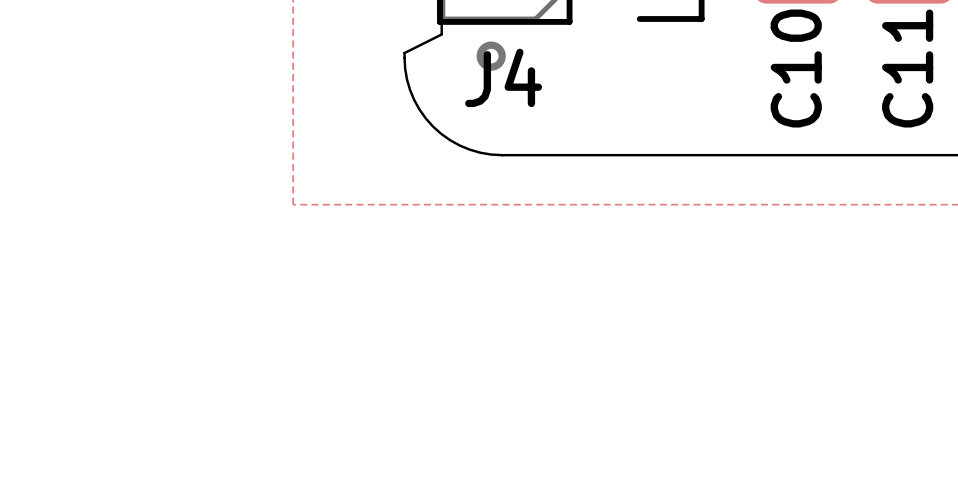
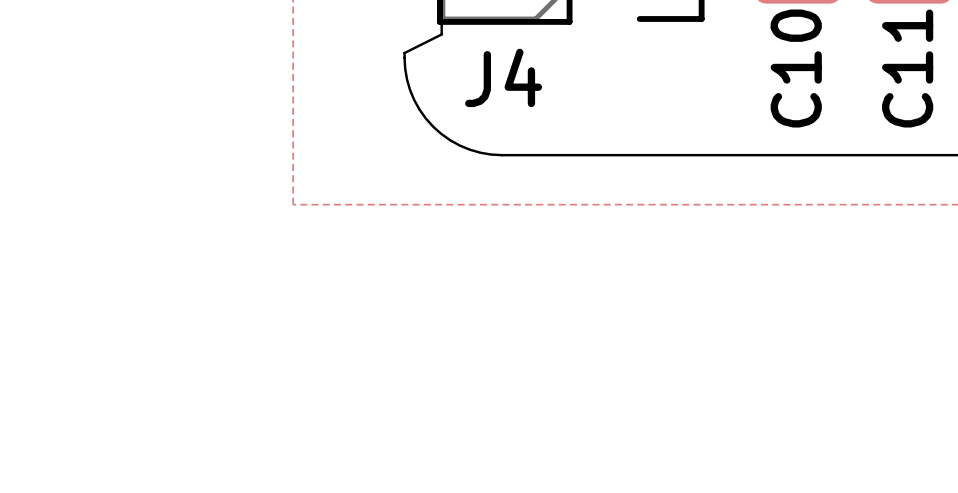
via: (491, 56) -> none

